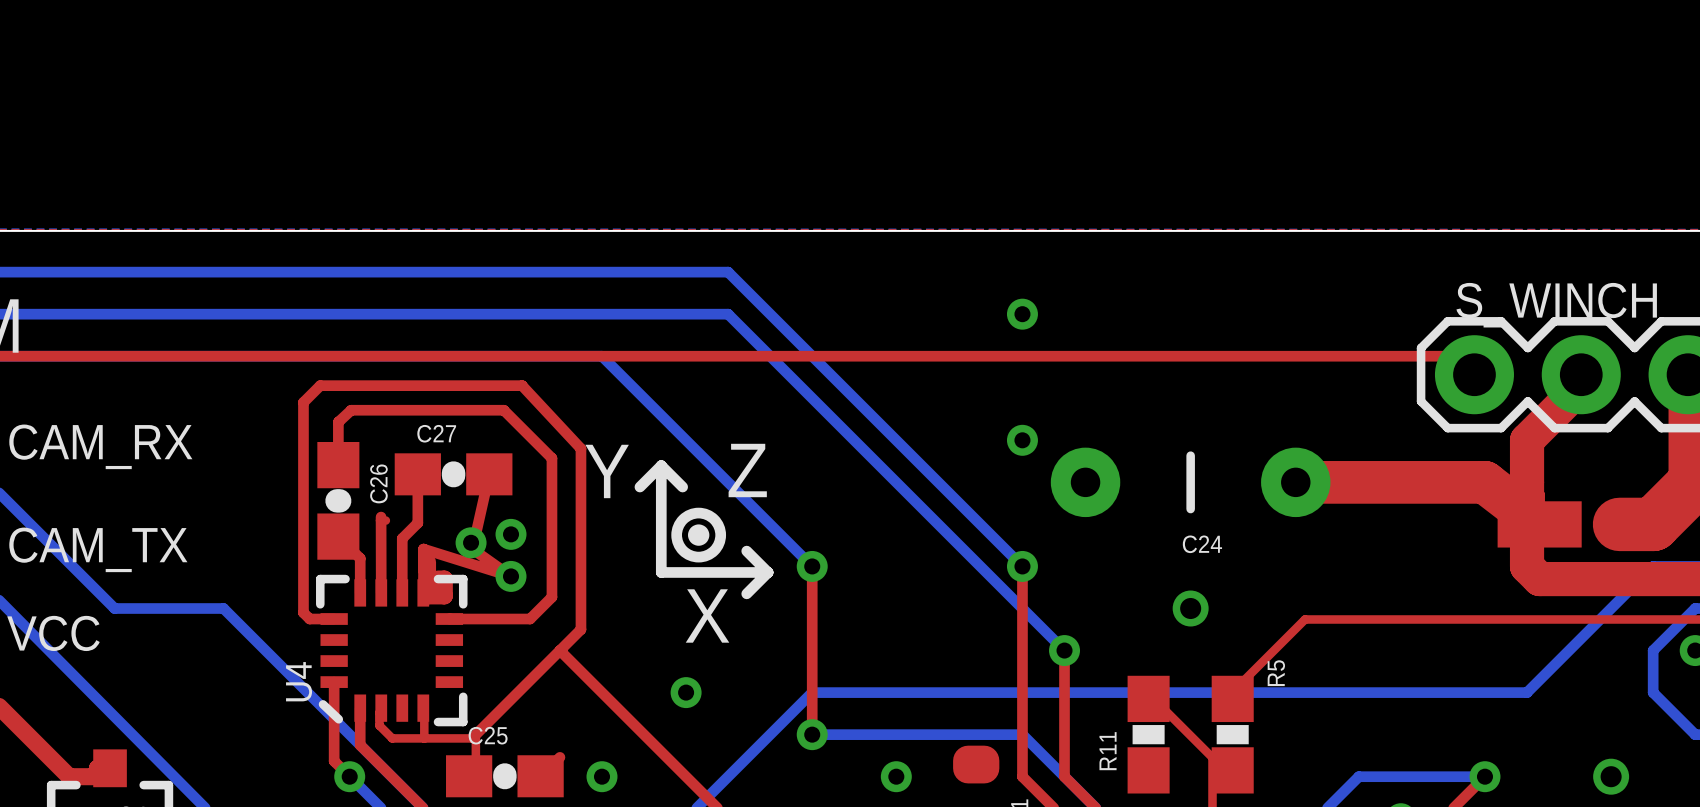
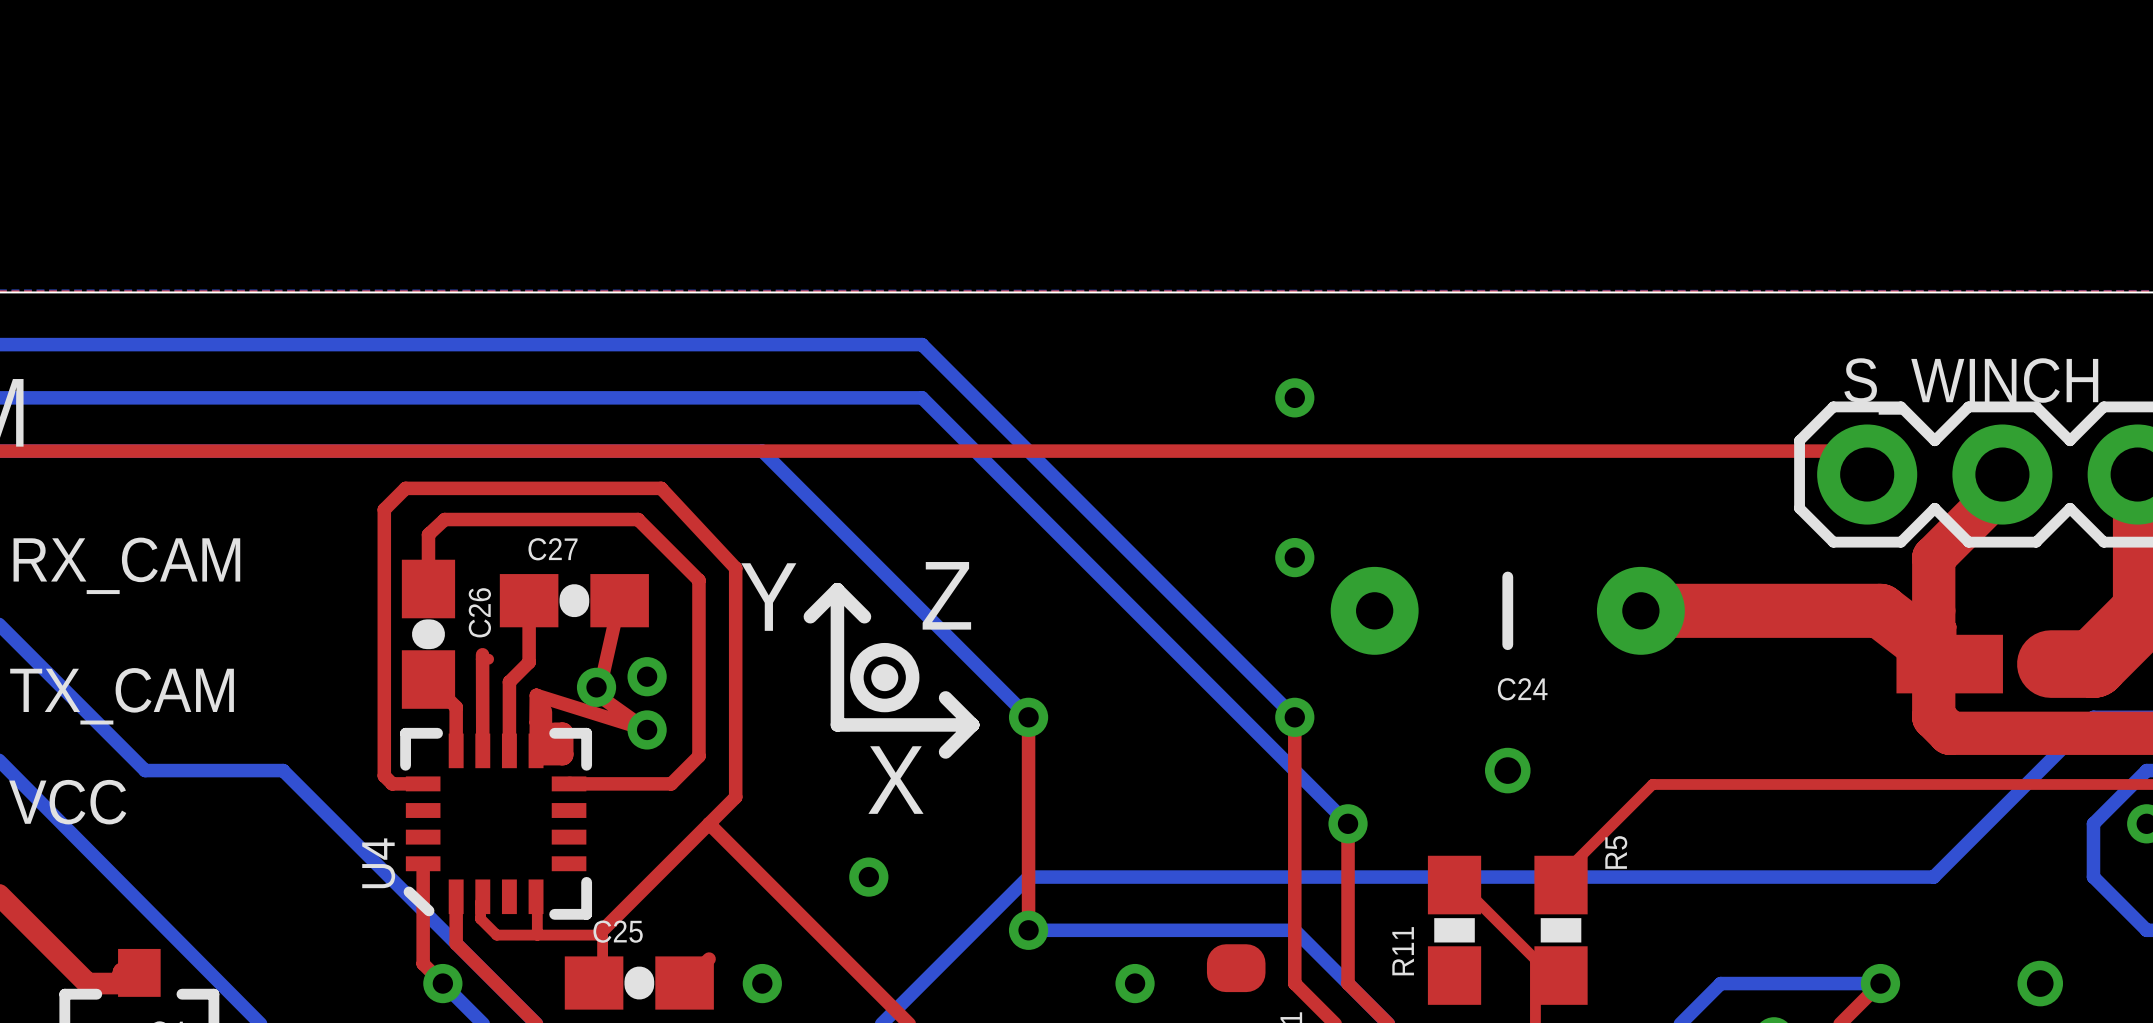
text: CAM_RX (100, 446) -> RX_CAM (126, 565)
text: CAM_TX (98, 549) -> TX_CAM (122, 696)

